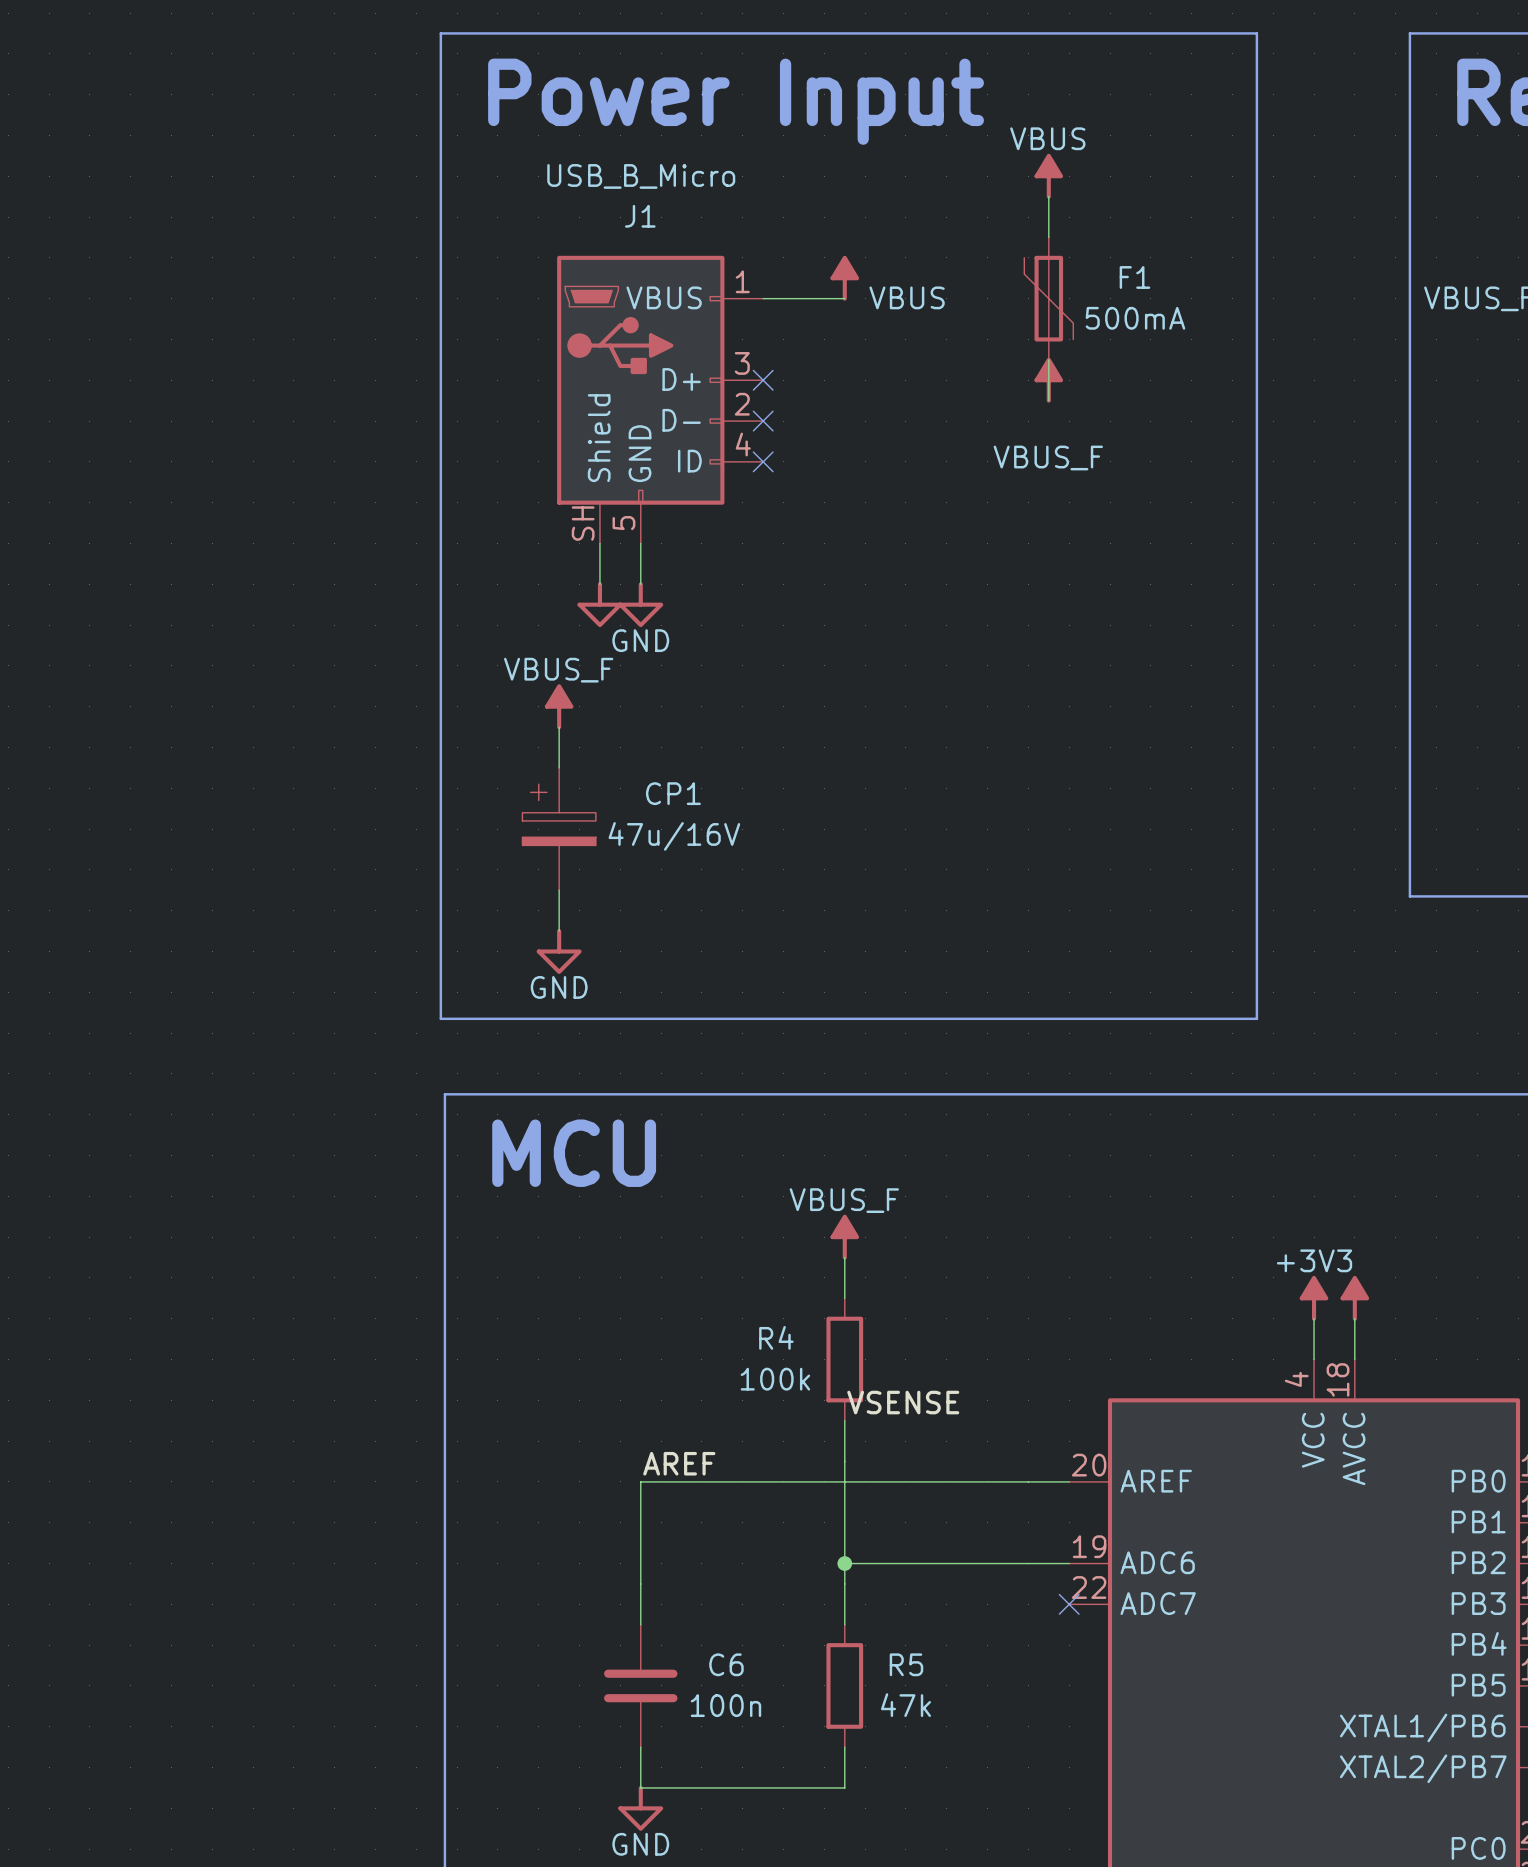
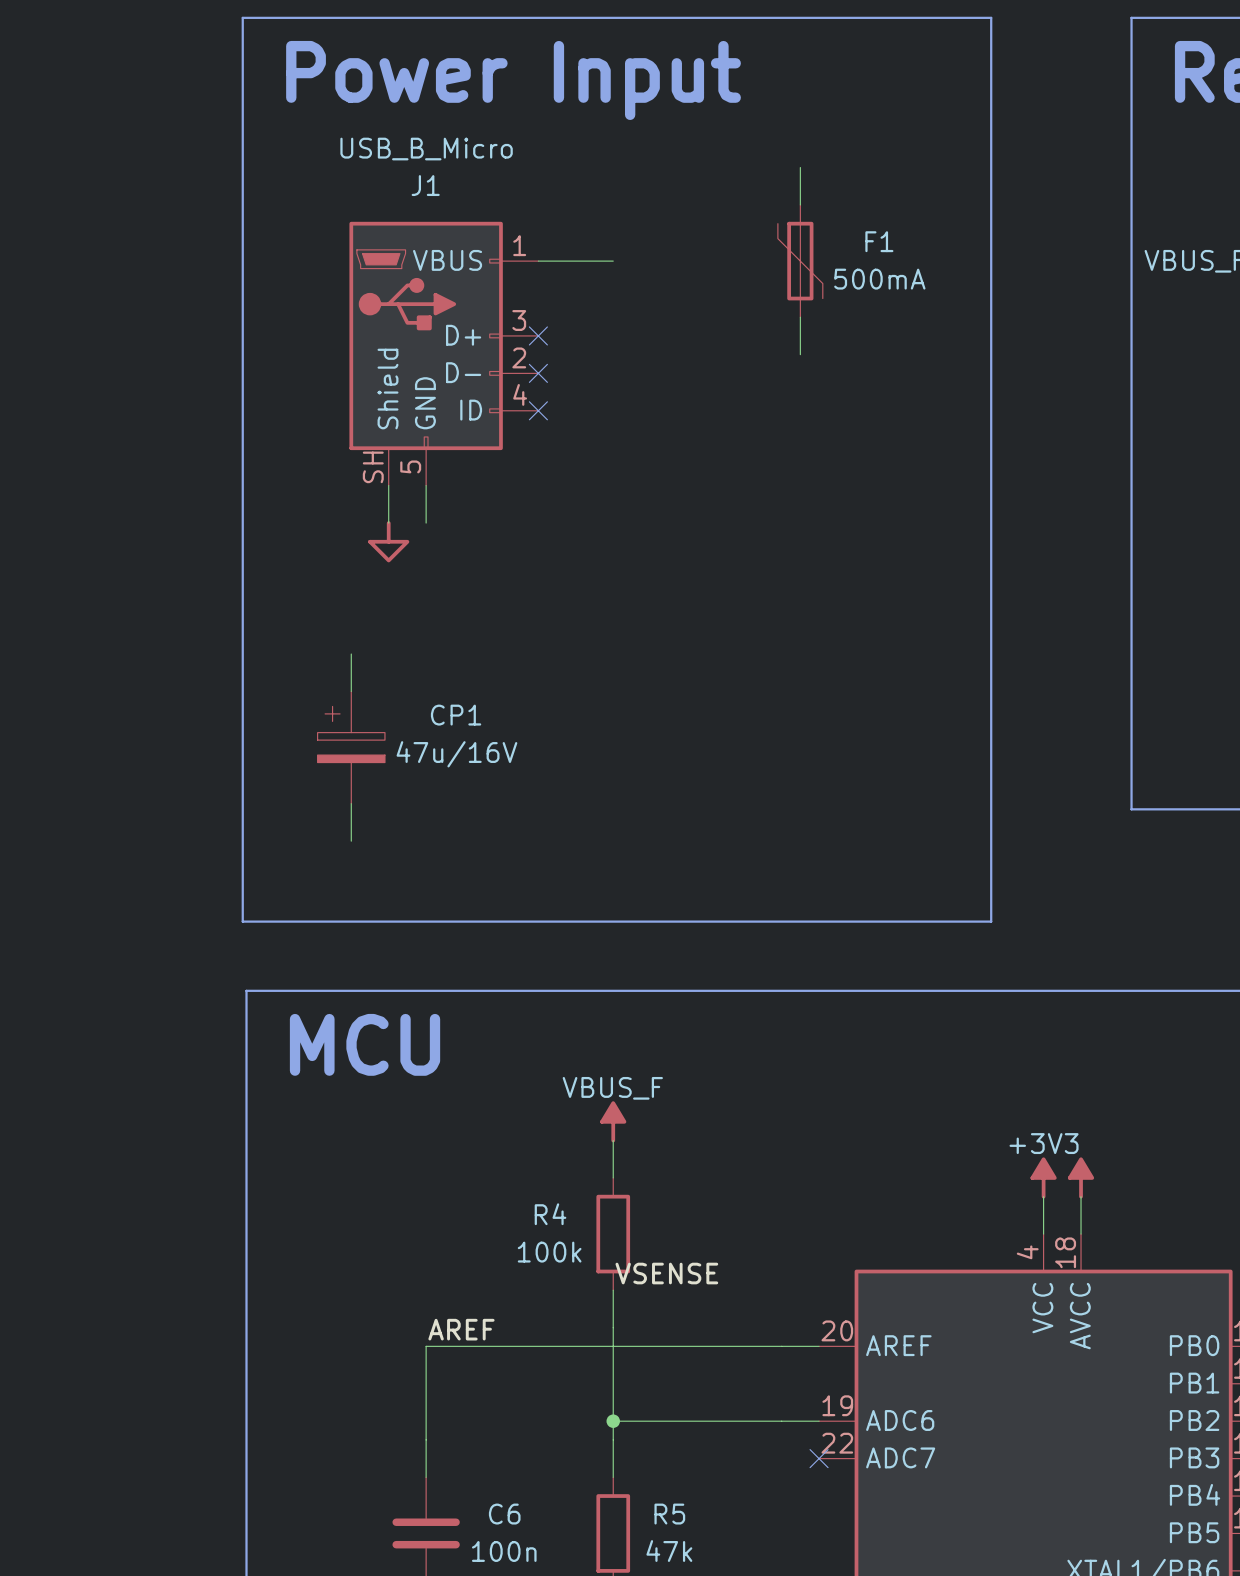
power symbol: VBUS (1048, 176) -> none
power symbol: VBUS (844, 278) -> none
power symbol: VBUS_F (1048, 380) -> none
power symbol: GND (640, 604) -> none
power symbol: VBUS_F (559, 706) -> none
power symbol: GND (559, 951) -> none

